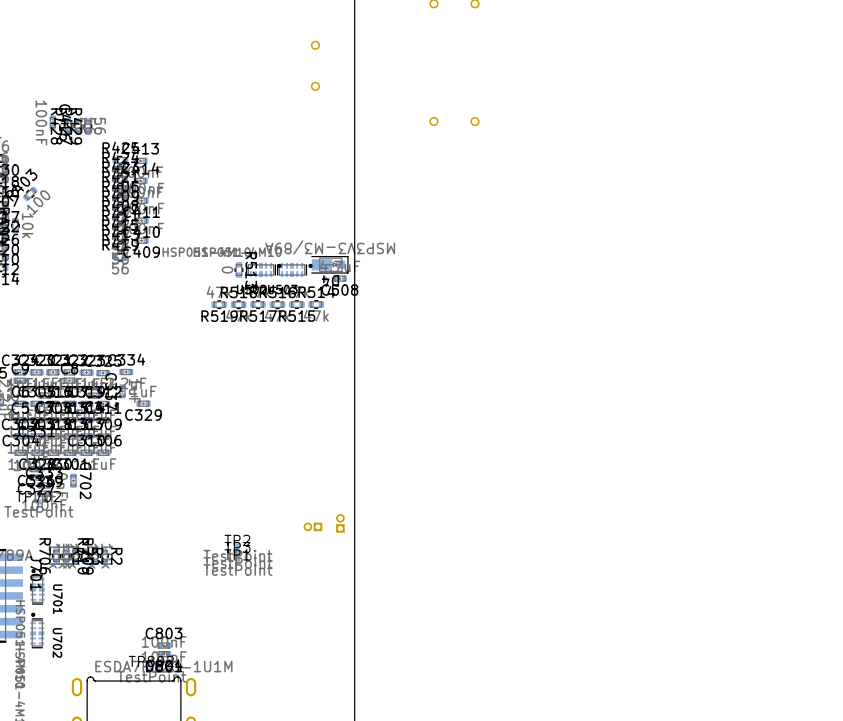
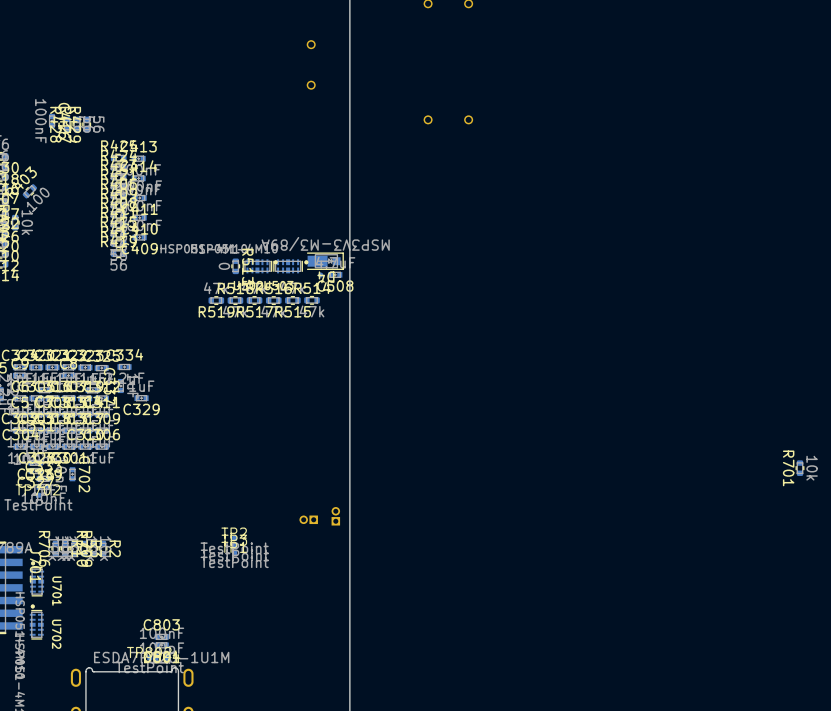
R701: none -> 10k (799, 468)

